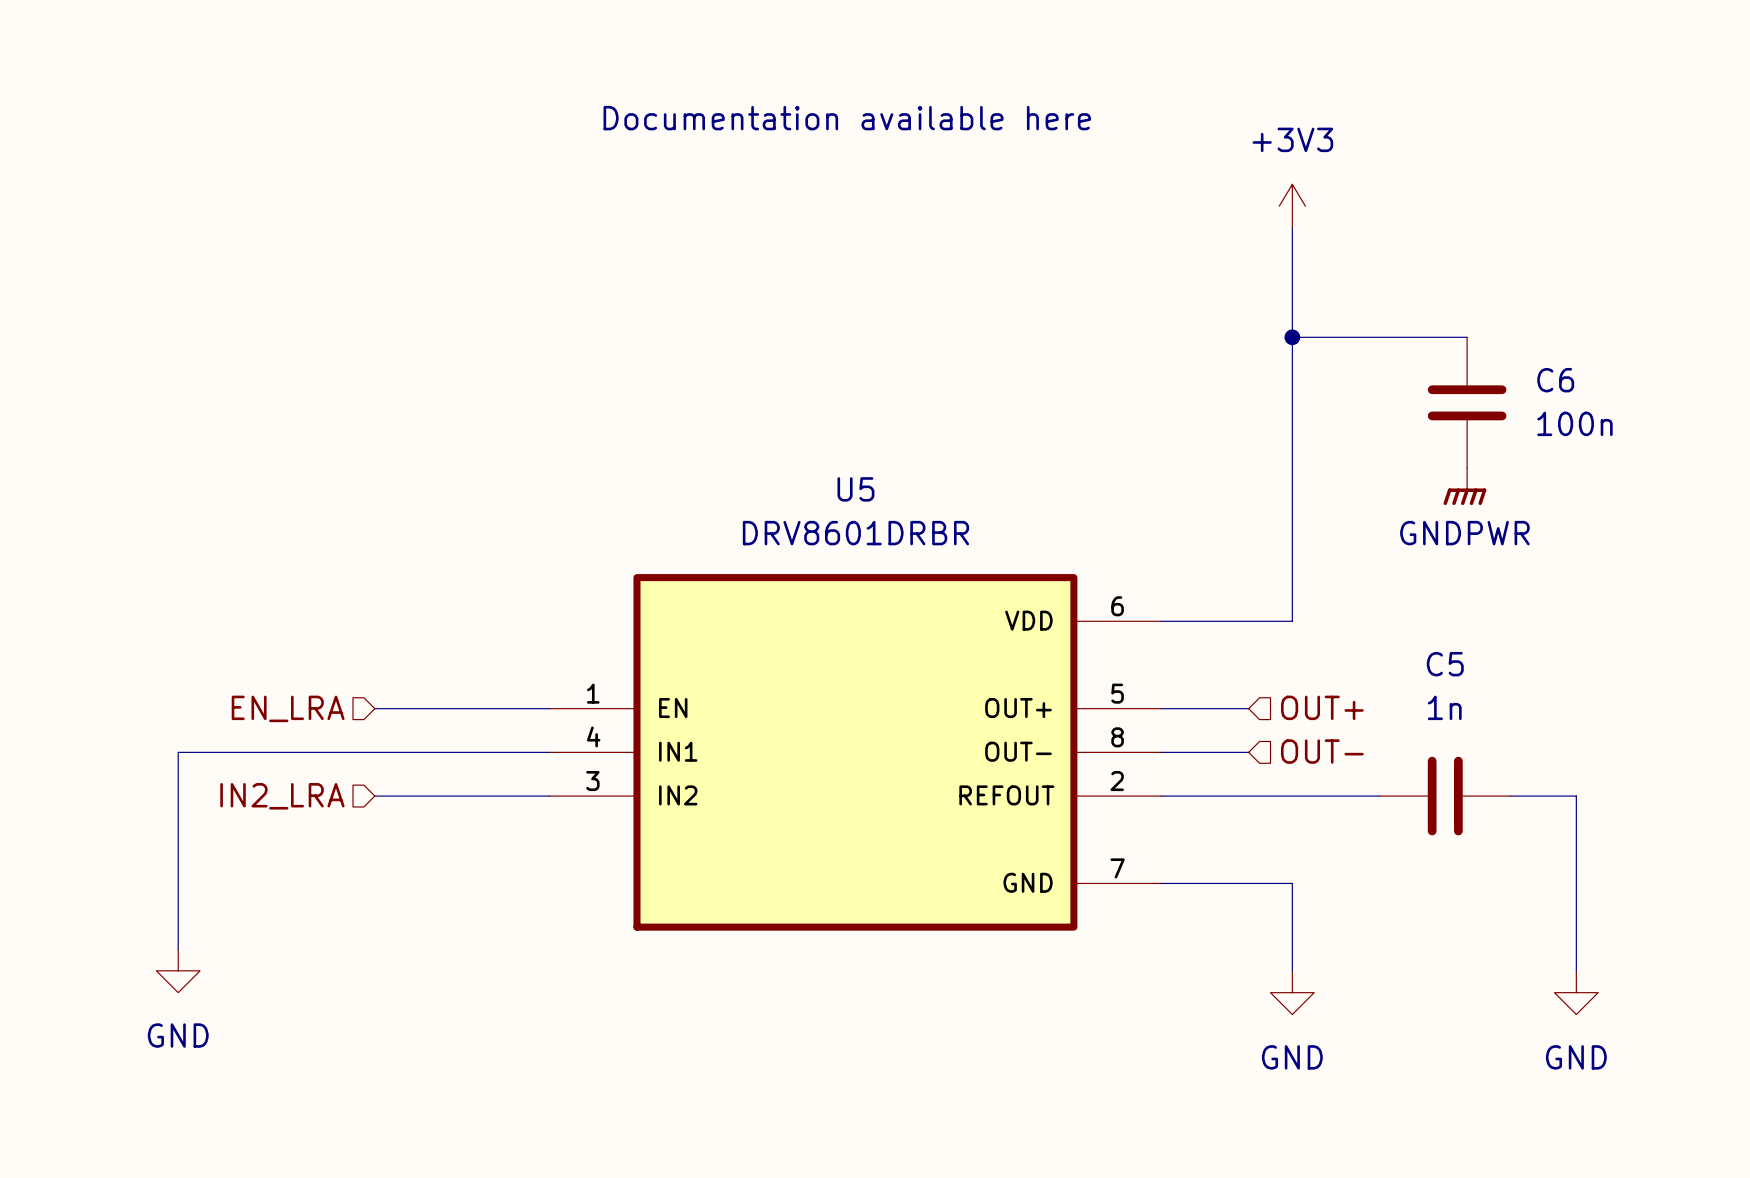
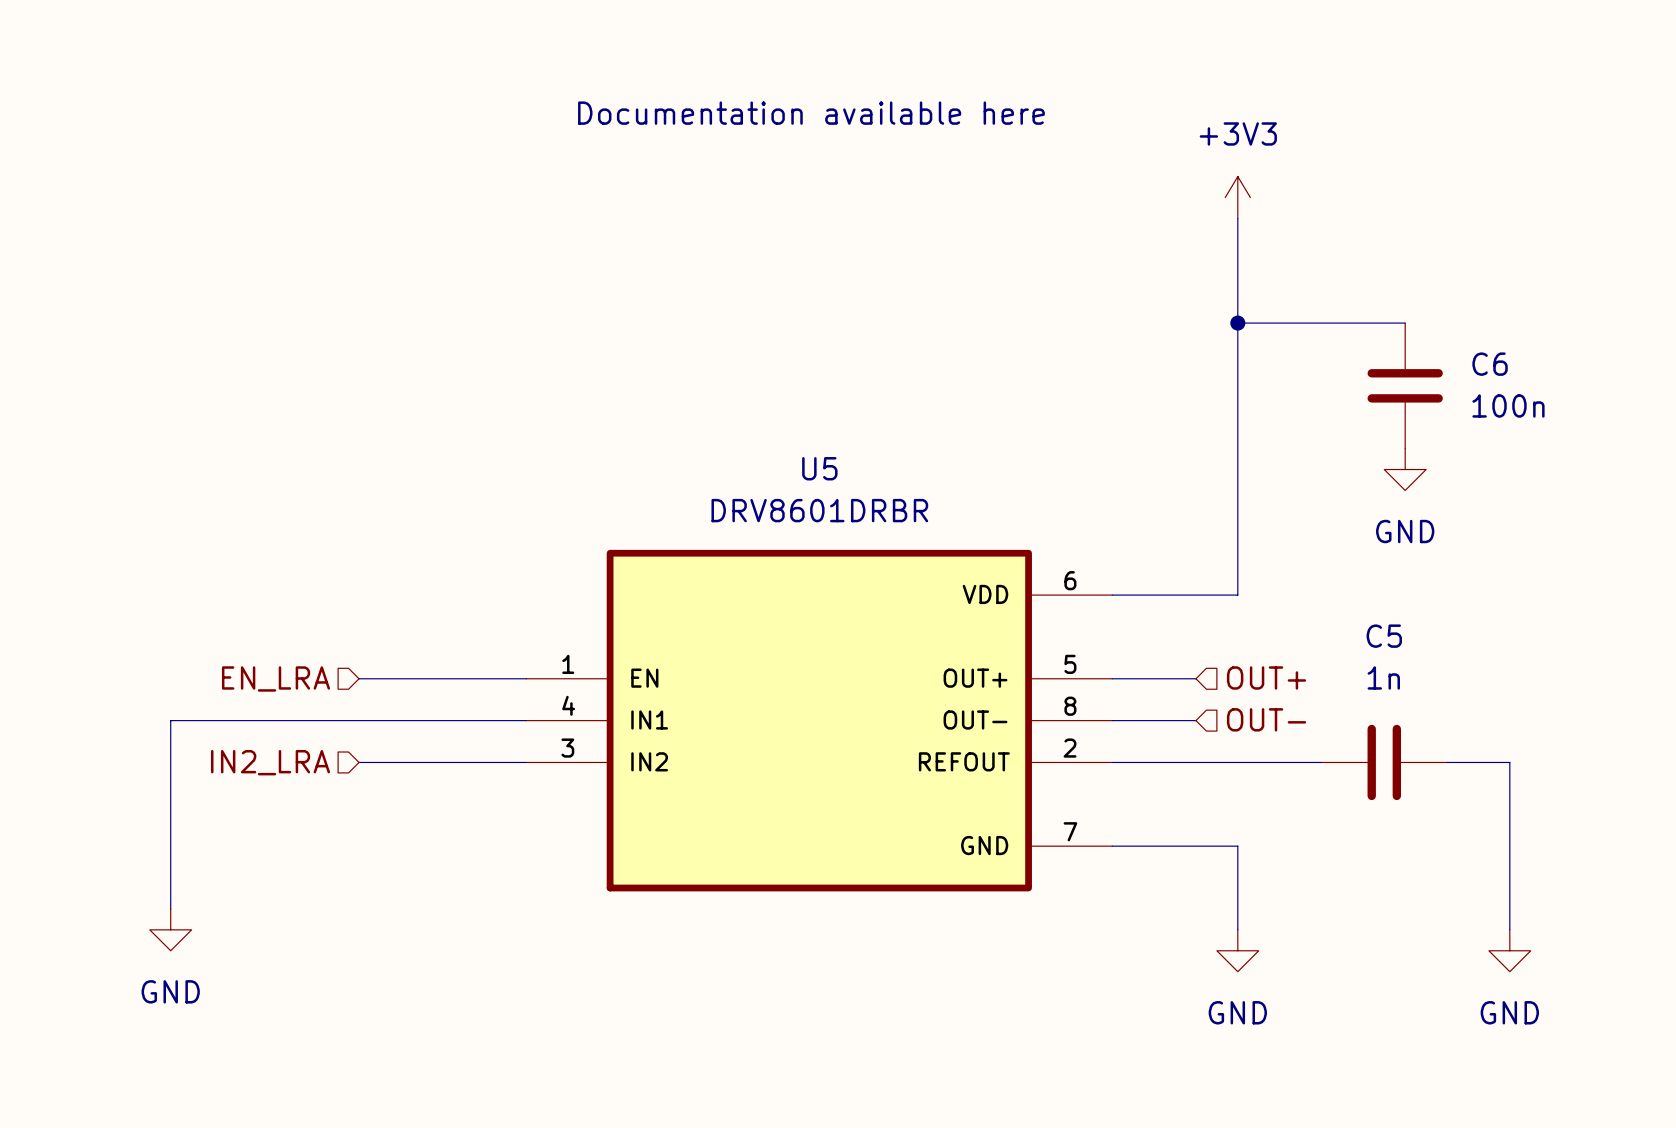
power symbol: GNDPWR (1464, 486) -> GND (1405, 469)

